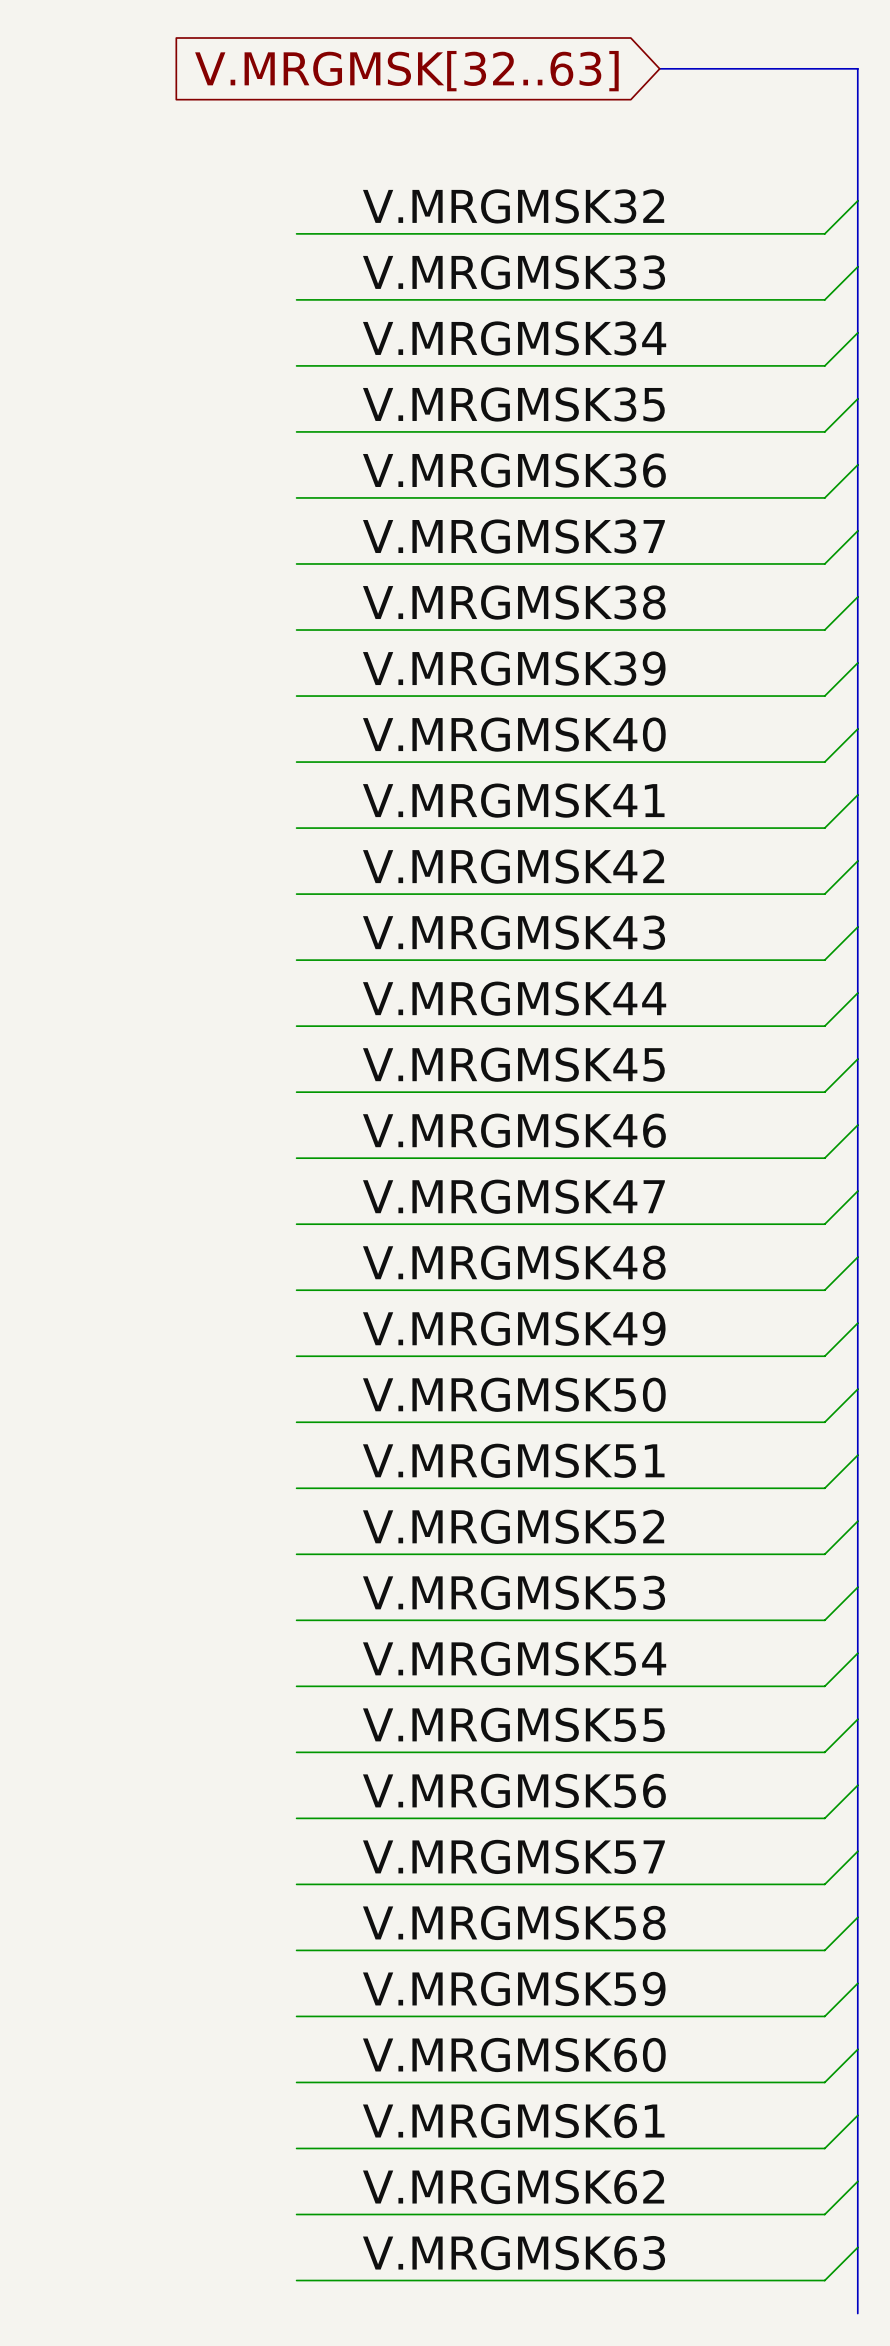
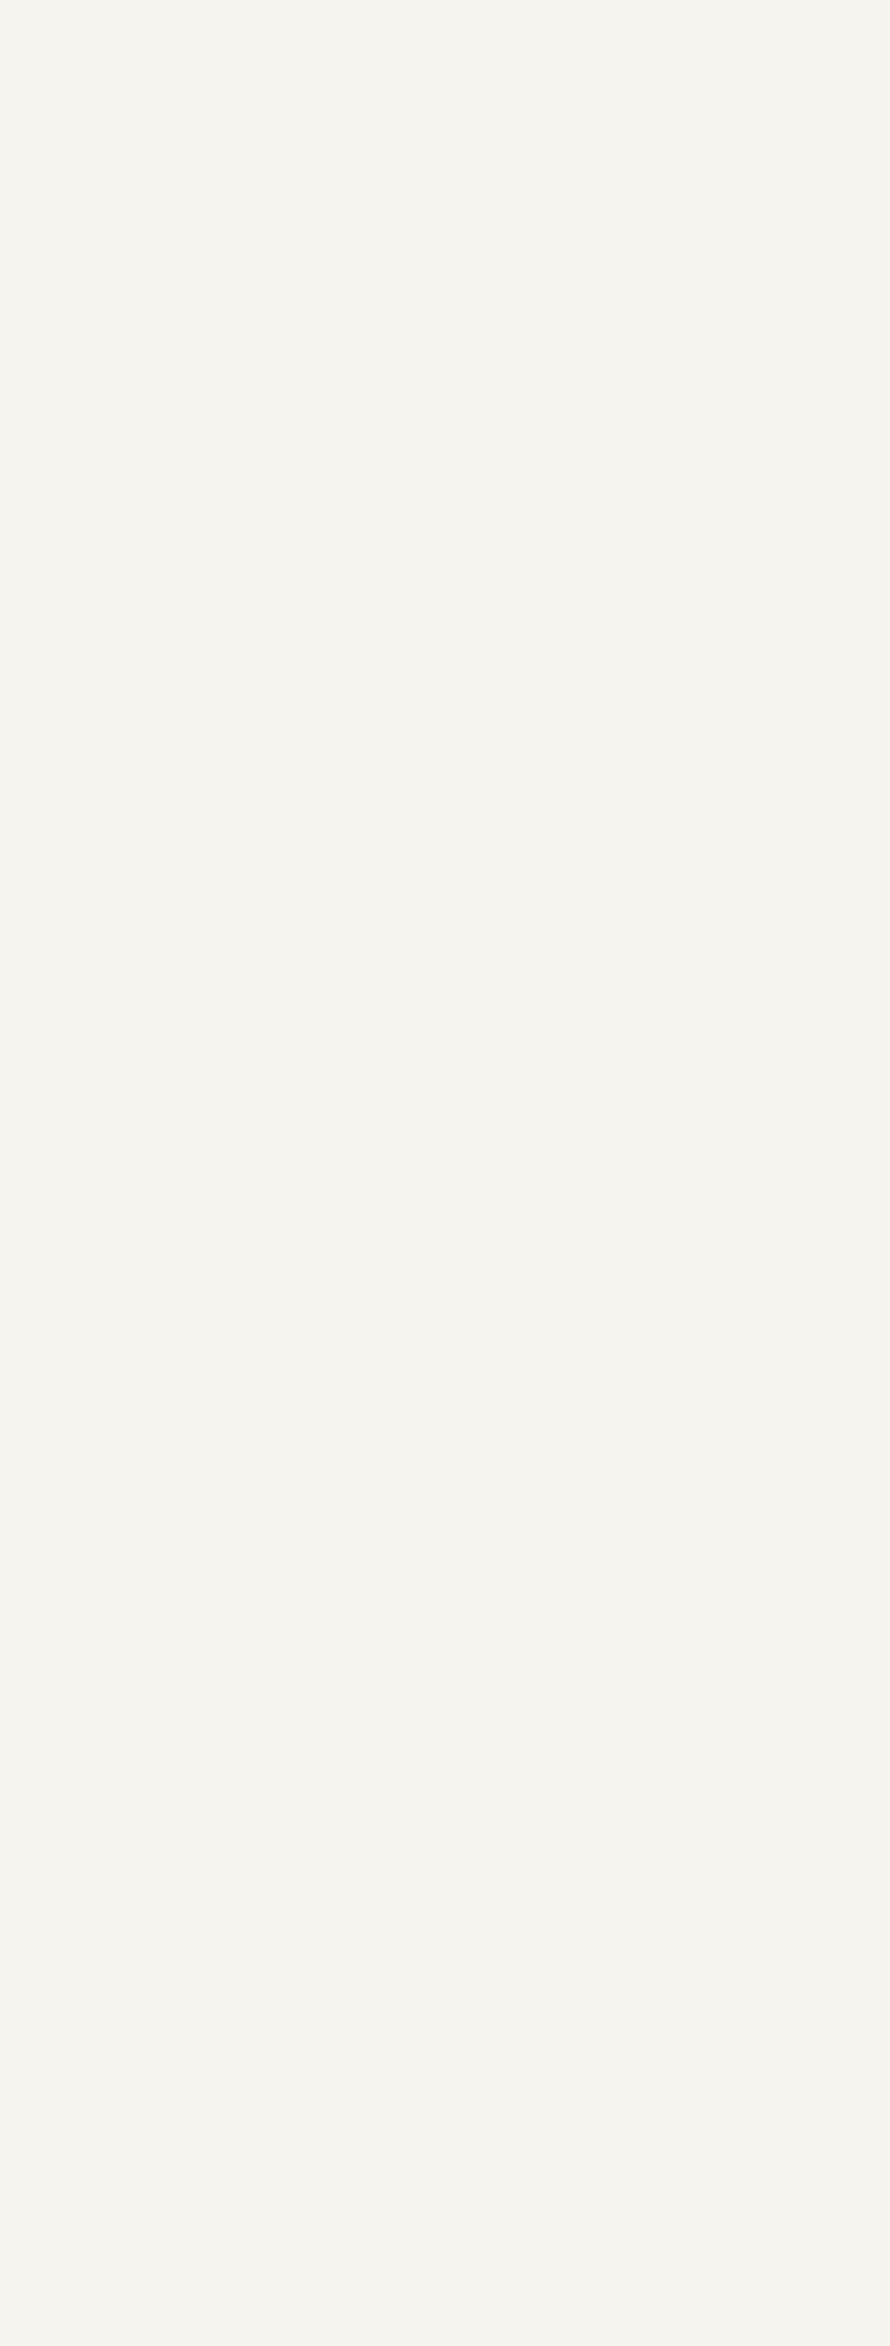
bus: (659, 68) (857, 68) (857, 2313) -> none
global label: V.MRGMSK[32..63] (406, 71) -> none
wire: (857, 200) (824, 233) (296, 233) -> none
label: V.MRGMSK32 (513, 206) -> none
wire: (857, 266) (824, 299) (296, 299) -> none
label: V.MRGMSK33 (514, 272) -> none
wire: (857, 332) (824, 365) (296, 365) -> none
label: V.MRGMSK34 (514, 338) -> none
wire: (857, 398) (824, 431) (296, 431) -> none
label: V.MRGMSK35 (513, 404) -> none
wire: (857, 464) (824, 497) (296, 497) -> none
label: V.MRGMSK36 (514, 470) -> none
wire: (857, 530) (824, 563) (296, 563) -> none
label: V.MRGMSK37 (513, 536) -> none
wire: (857, 597) (824, 630) (296, 630) -> none
label: V.MRGMSK38 (514, 602) -> none
wire: (857, 663) (824, 696) (296, 696) -> none
label: V.MRGMSK39 (514, 668) -> none
wire: (857, 729) (824, 762) (296, 762) -> none
label: V.MRGMSK40 (514, 734) -> none
wire: (857, 795) (824, 828) (296, 828) -> none
label: V.MRGMSK41 (513, 800) -> none
wire: (857, 861) (824, 894) (296, 894) -> none
label: V.MRGMSK42 (513, 866) -> none
wire: (857, 927) (824, 960) (296, 960) -> none
label: V.MRGMSK43 (514, 932) -> none
wire: (857, 993) (824, 1026) (296, 1026) -> none
label: V.MRGMSK44 (514, 998) -> none
wire: (857, 1059) (824, 1092) (296, 1092) -> none
label: V.MRGMSK45 (513, 1064) -> none
wire: (857, 1125) (824, 1158) (296, 1158) -> none
label: V.MRGMSK46 (514, 1130) -> none
wire: (857, 1191) (824, 1224) (296, 1224) -> none
label: V.MRGMSK47 (513, 1196) -> none
wire: (857, 1257) (824, 1290) (296, 1290) -> none
label: V.MRGMSK48 (514, 1262) -> none
wire: (857, 1323) (824, 1356) (296, 1356) -> none
label: V.MRGMSK49 (514, 1328) -> none
wire: (857, 1389) (824, 1422) (296, 1422) -> none
label: V.MRGMSK50 (514, 1394) -> none
wire: (857, 1455) (824, 1488) (296, 1488) -> none
label: V.MRGMSK51 (513, 1460) -> none
wire: (857, 1521) (824, 1554) (296, 1554) -> none
label: V.MRGMSK52 (513, 1526) -> none
wire: (857, 1587) (824, 1620) (296, 1620) -> none
label: V.MRGMSK53 (514, 1592) -> none
wire: (857, 1653) (824, 1686) (296, 1686) -> none
label: V.MRGMSK54 (514, 1658) -> none
wire: (857, 1719) (824, 1752) (296, 1752) -> none
label: V.MRGMSK55 (513, 1724) -> none
wire: (857, 1785) (824, 1818) (296, 1818) -> none
label: V.MRGMSK56 (514, 1790) -> none
wire: (857, 1851) (824, 1884) (296, 1884) -> none
label: V.MRGMSK57 (513, 1856) -> none
wire: (857, 1917) (824, 1950) (296, 1950) -> none
label: V.MRGMSK58 (514, 1922) -> none
wire: (857, 1983) (824, 2016) (296, 2016) -> none
label: V.MRGMSK59 (514, 1988) -> none
wire: (857, 2049) (824, 2082) (296, 2082) -> none
label: V.MRGMSK60 (514, 2055) -> none
wire: (857, 2115) (824, 2148) (296, 2148) -> none
label: V.MRGMSK61 (513, 2121) -> none
wire: (857, 2181) (824, 2214) (296, 2214) -> none
label: V.MRGMSK62 (513, 2187) -> none
wire: (857, 2247) (824, 2280) (296, 2280) -> none
label: V.MRGMSK63 (514, 2253) -> none

